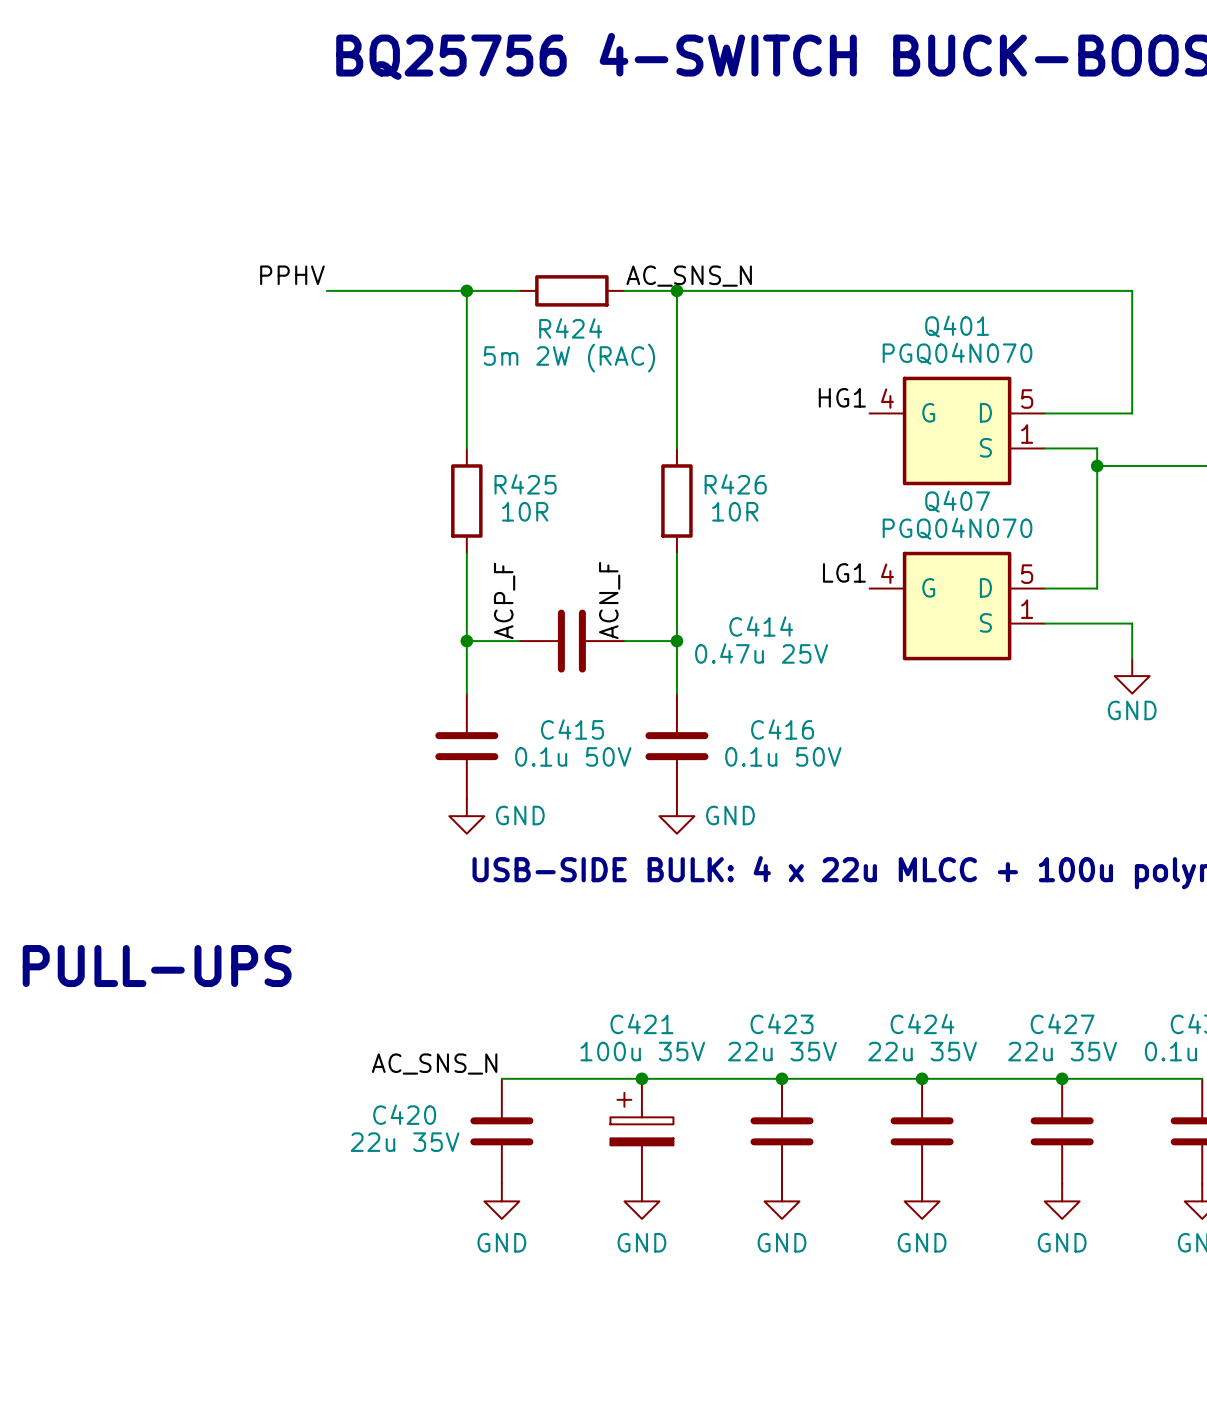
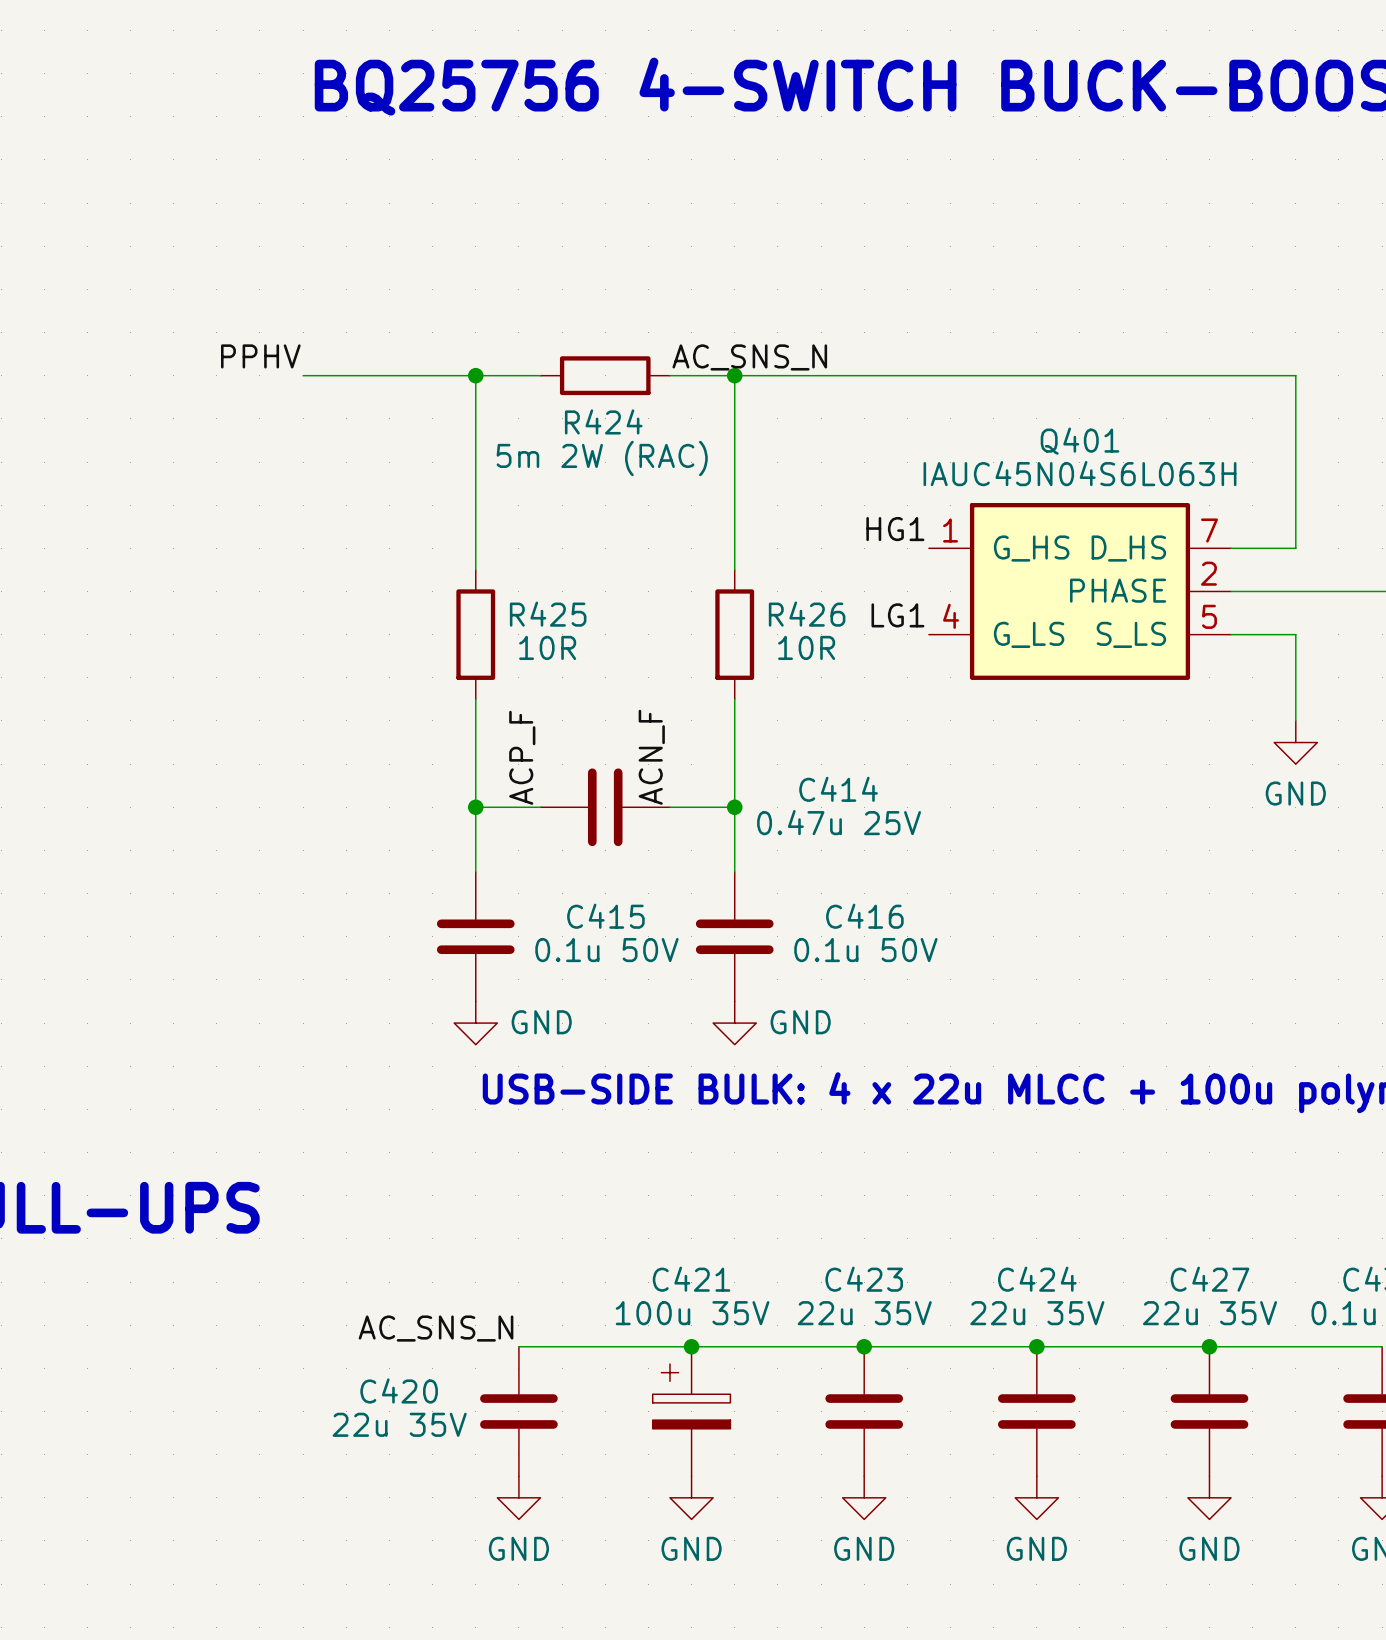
Q401 value: PGQ04N070 (957, 353) -> IAUC45N04S6L063H (1079, 473)
Q401 symbol: [869, 376, 1045, 486] -> [928, 503, 1232, 680]
label position: HG1 (842, 397) -> HG1 (895, 529)
wire: (1044, 413) (1132, 413) -> (1231, 548) (1295, 548) (1295, 526)
wire: (1044, 448) (1097, 448) (1097, 588) (1044, 588) -> none
wire: none -> (1231, 591) (1252, 591)
junction: (1097, 465) -> none
wire: none -> (1231, 634) (1295, 634) (1295, 720)
label position: LG1 (844, 572) -> LG1 (897, 615)
Q407: PGQ04N070 (957, 606) -> none
wire: (1044, 623) (1132, 623) (1132, 658) -> none
power symbol position: GND (1132, 676) -> GND (1295, 742)
power symbol text position: GND (1132, 710) -> GND (1295, 793)

